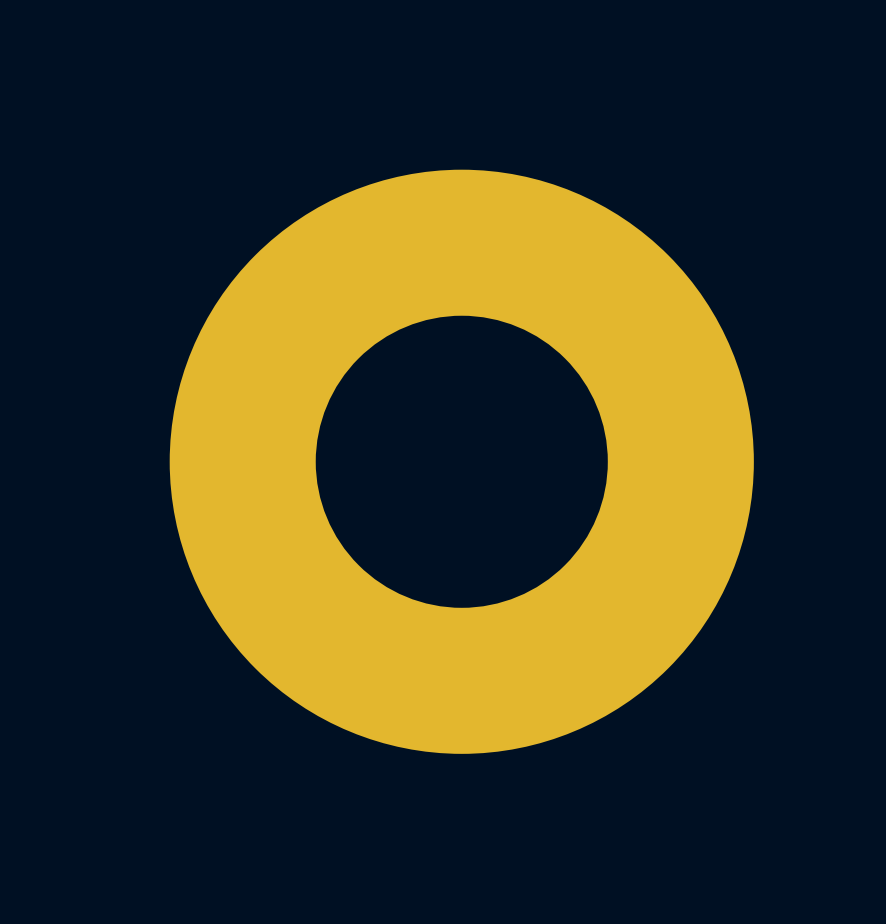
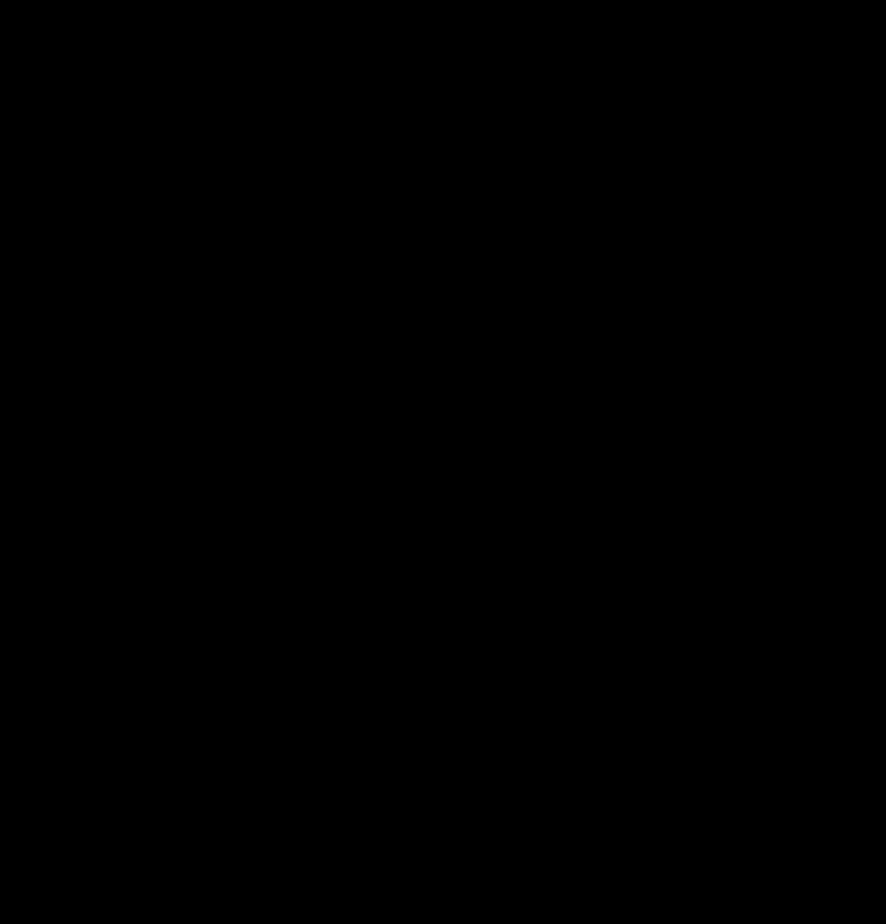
part: (461, 461) -> none

